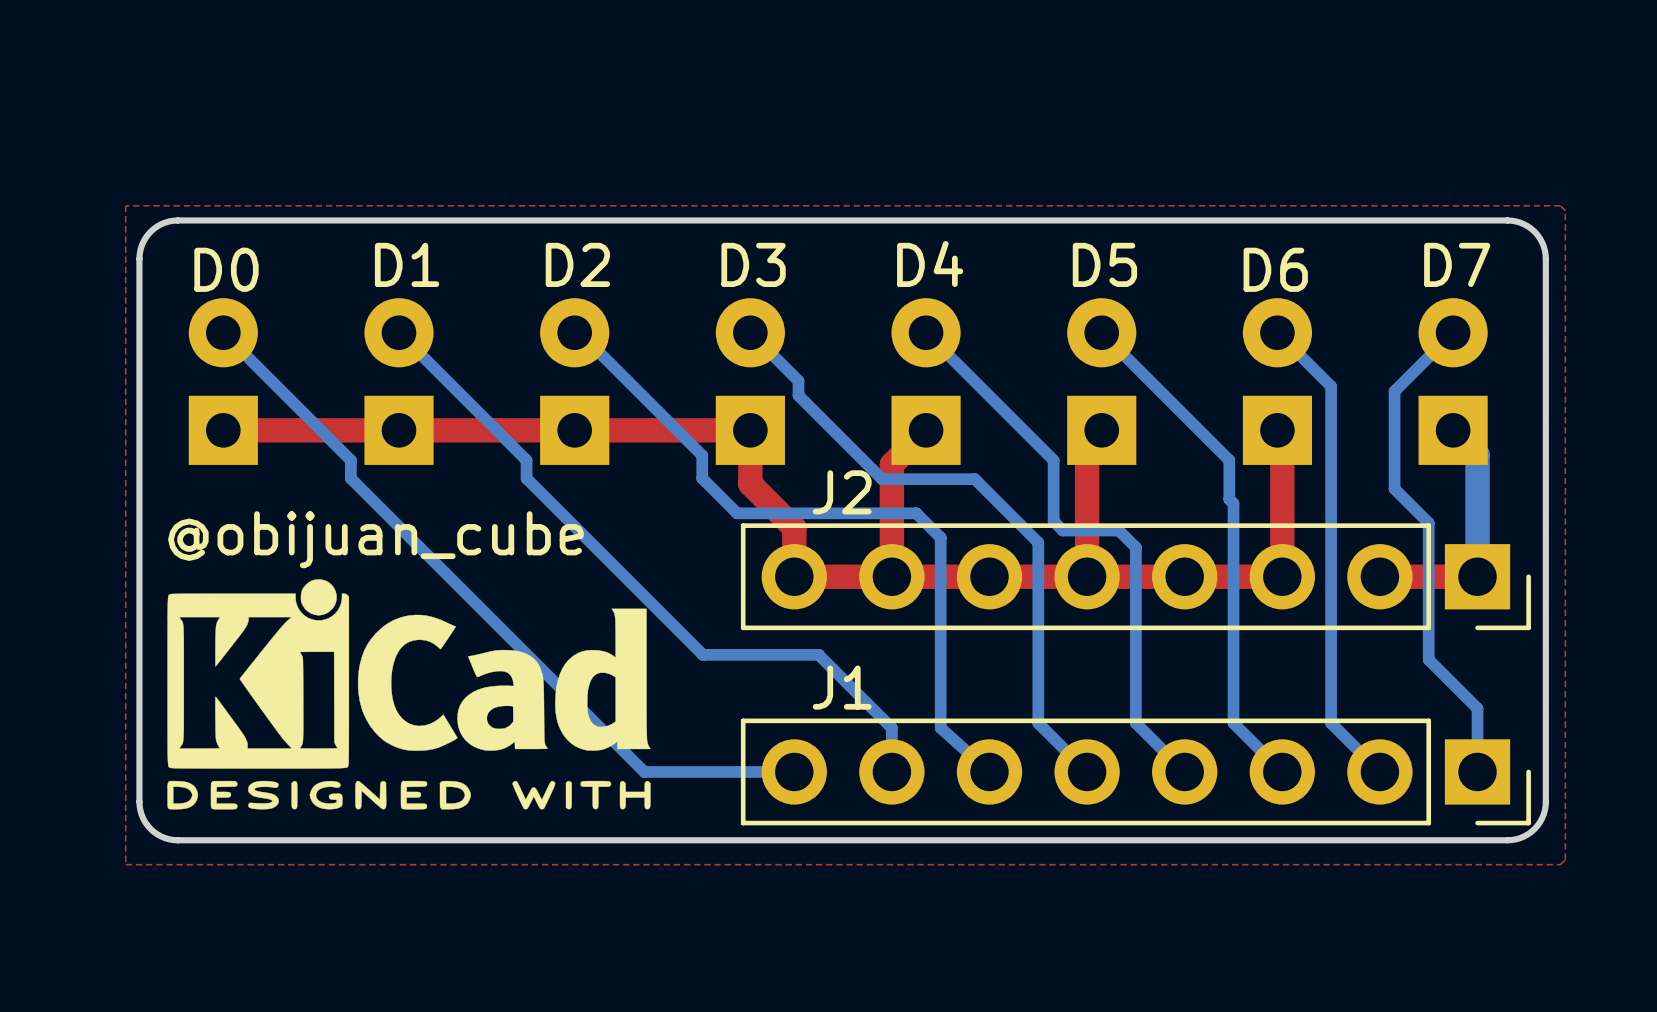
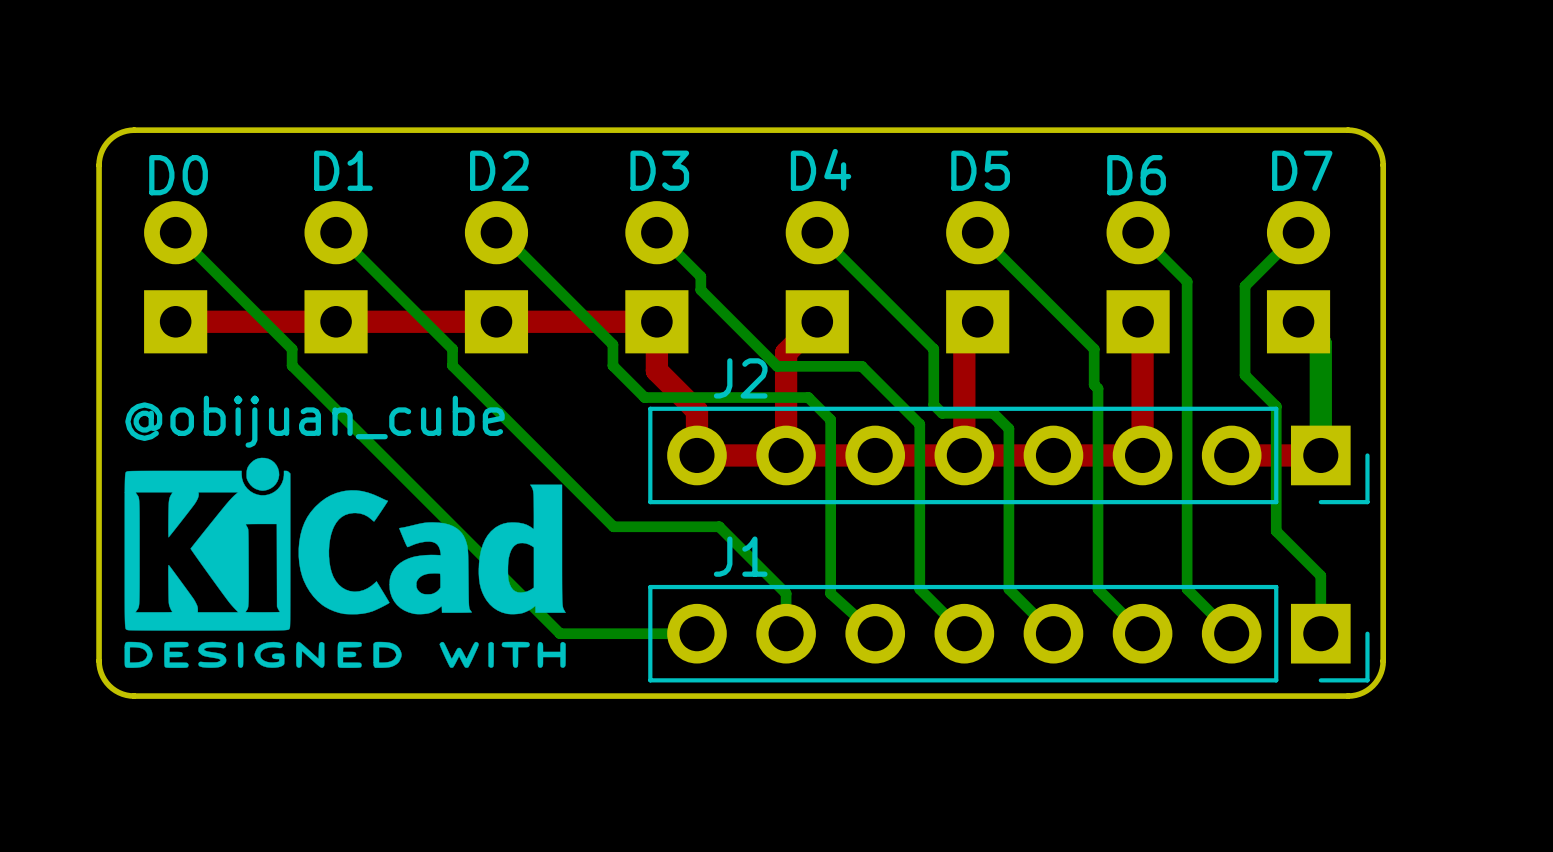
top zone outline: (1560, 205) (125, 205) (125, 864) (1560, 864) (1565, 859) (1565, 210) (1560, 205) -> none

